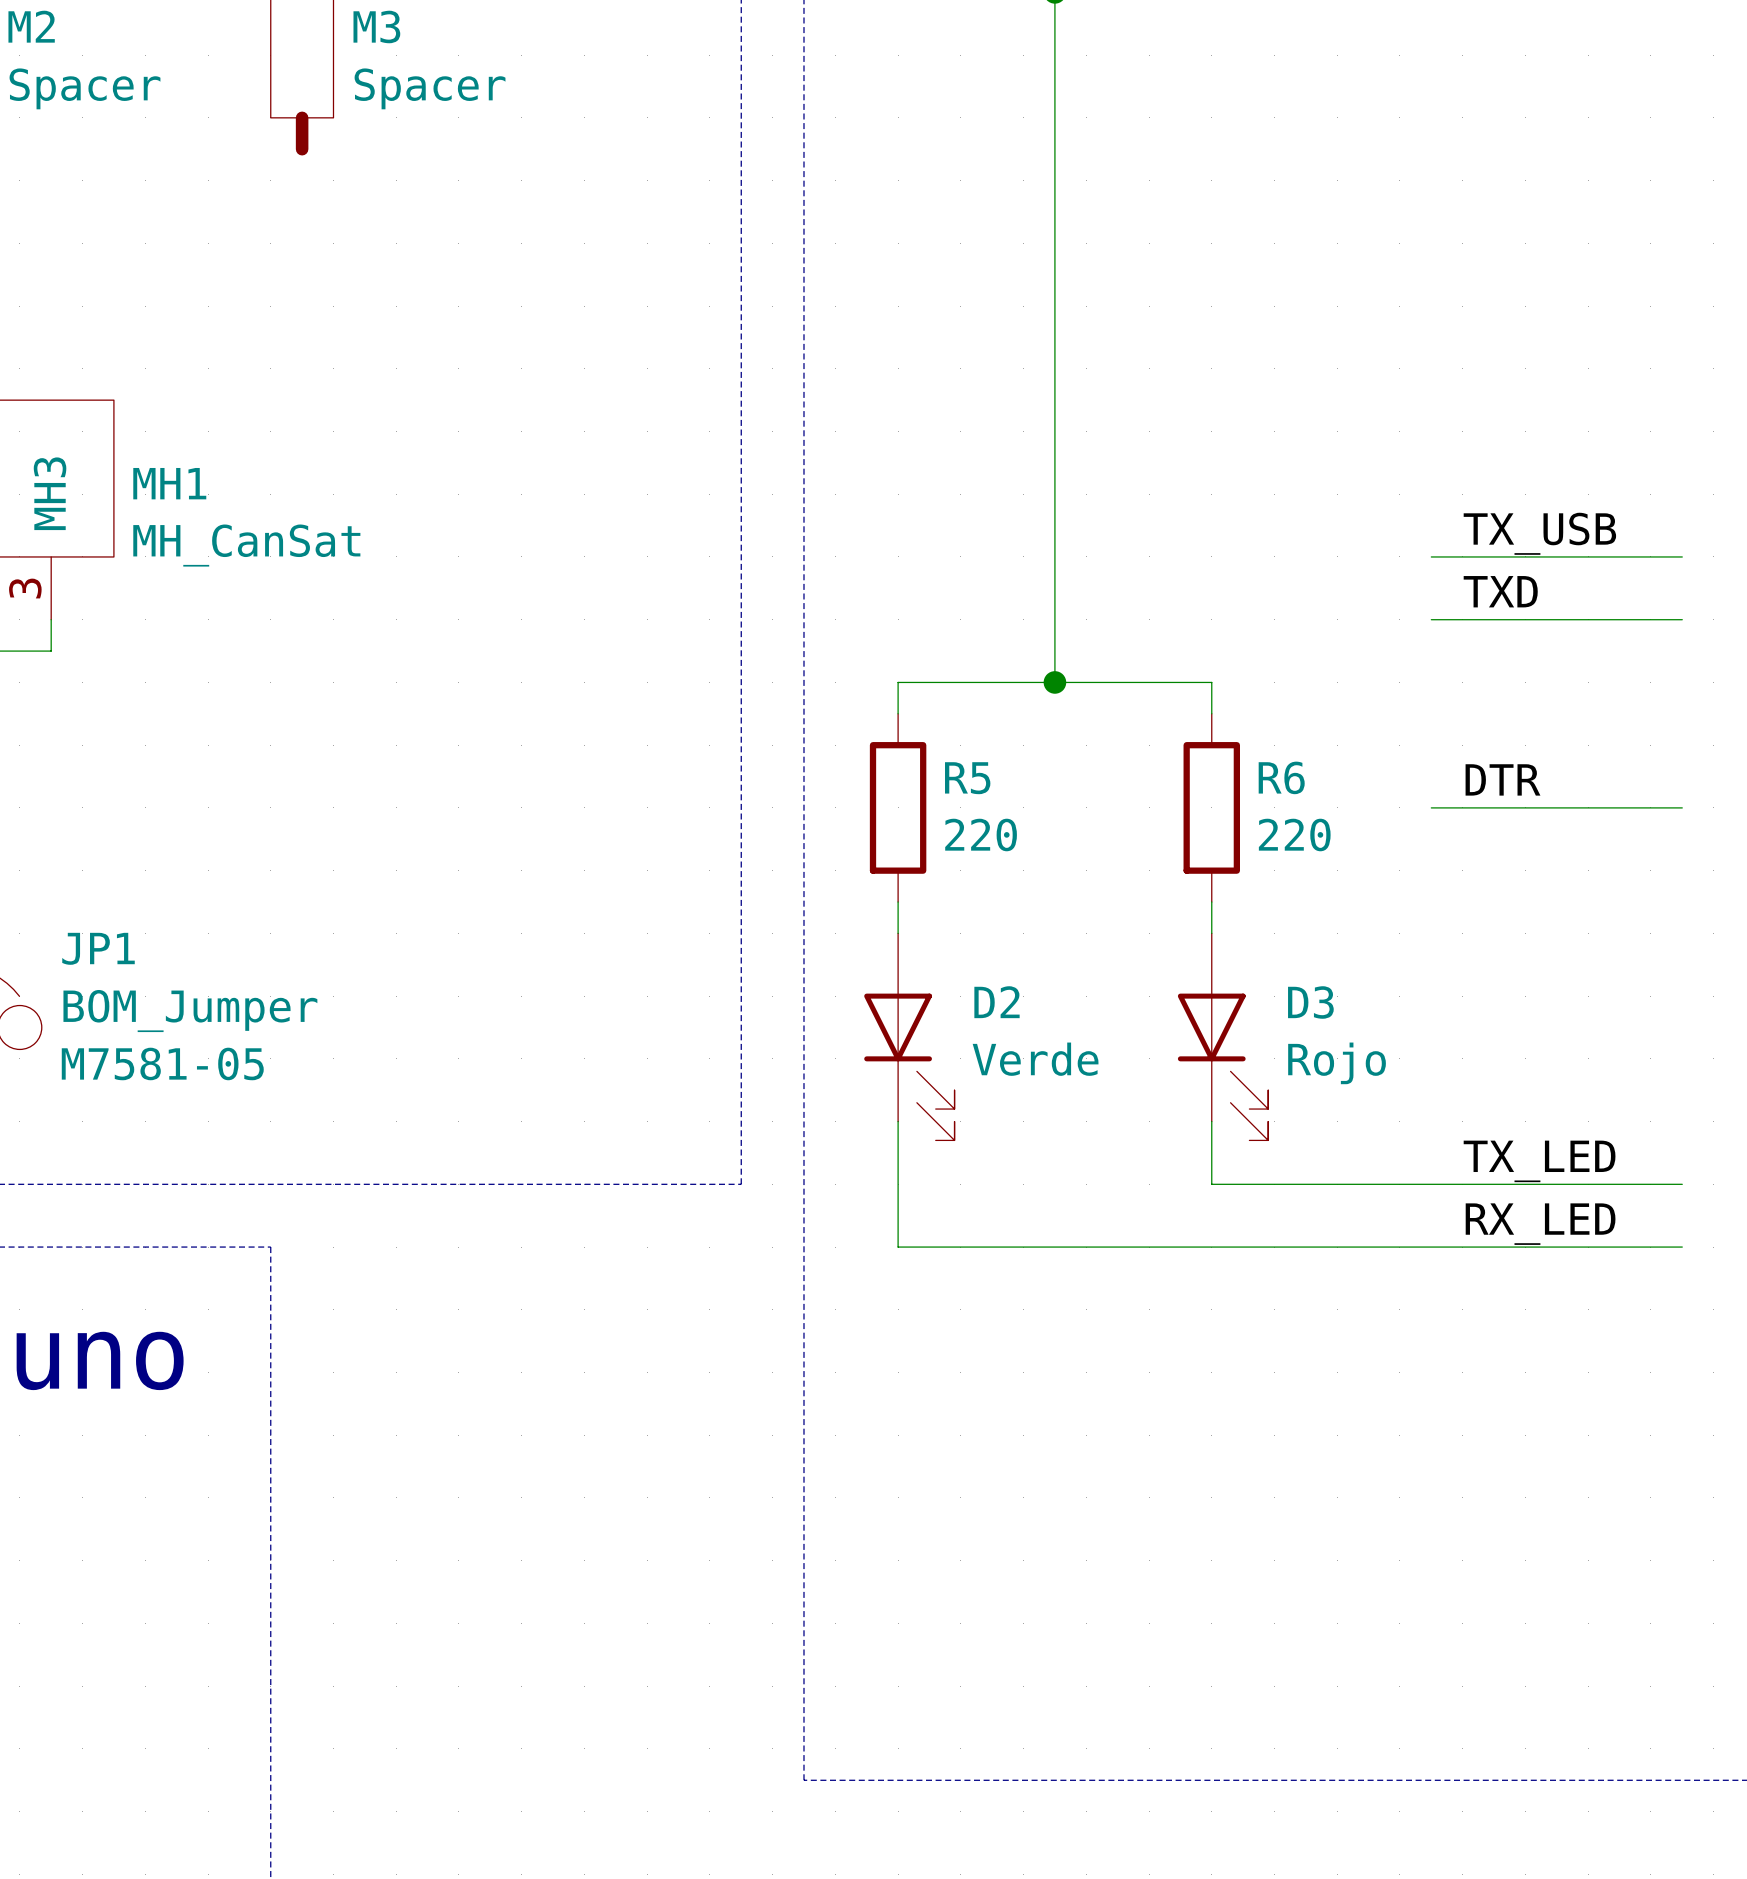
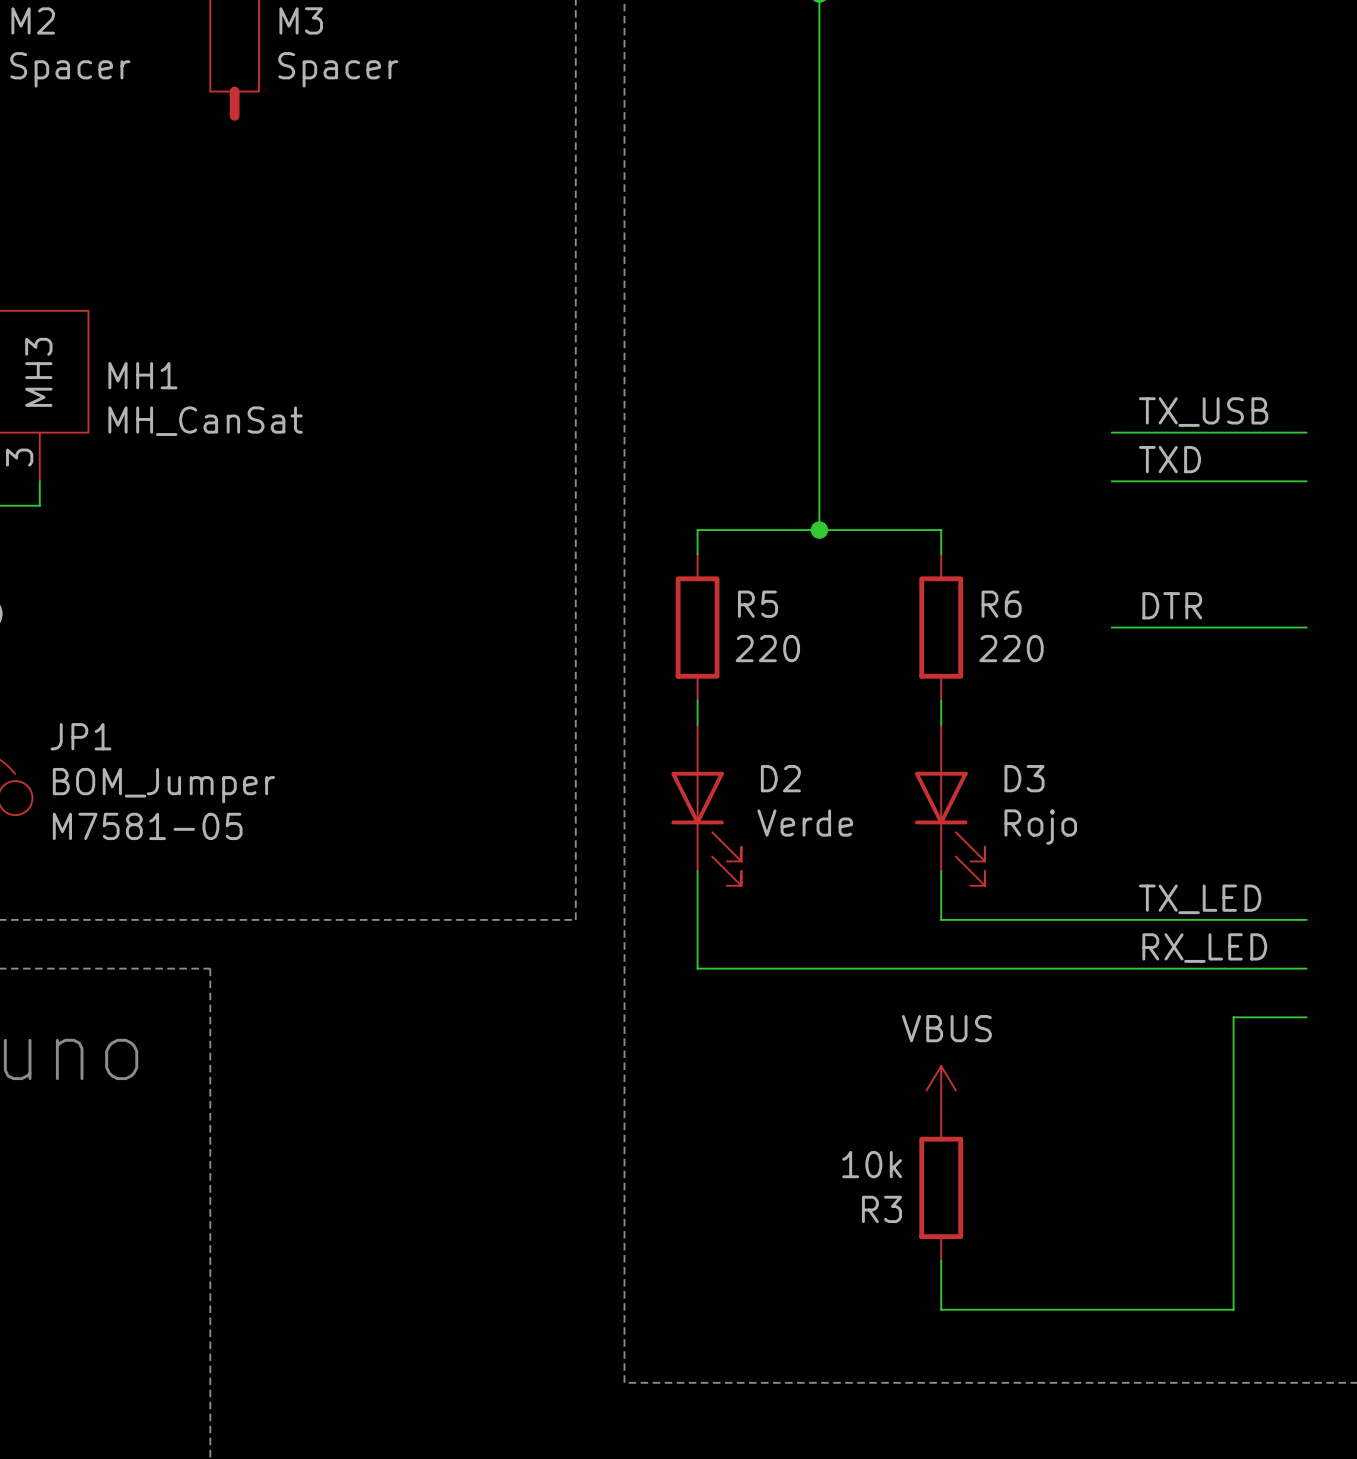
wire: none -> (1306, 1017) (1233, 1017) (1233, 1309) (941, 1309) (941, 1260)
power symbol: none -> VBUS (941, 1090)
R3: none -> 10k (941, 1187)

